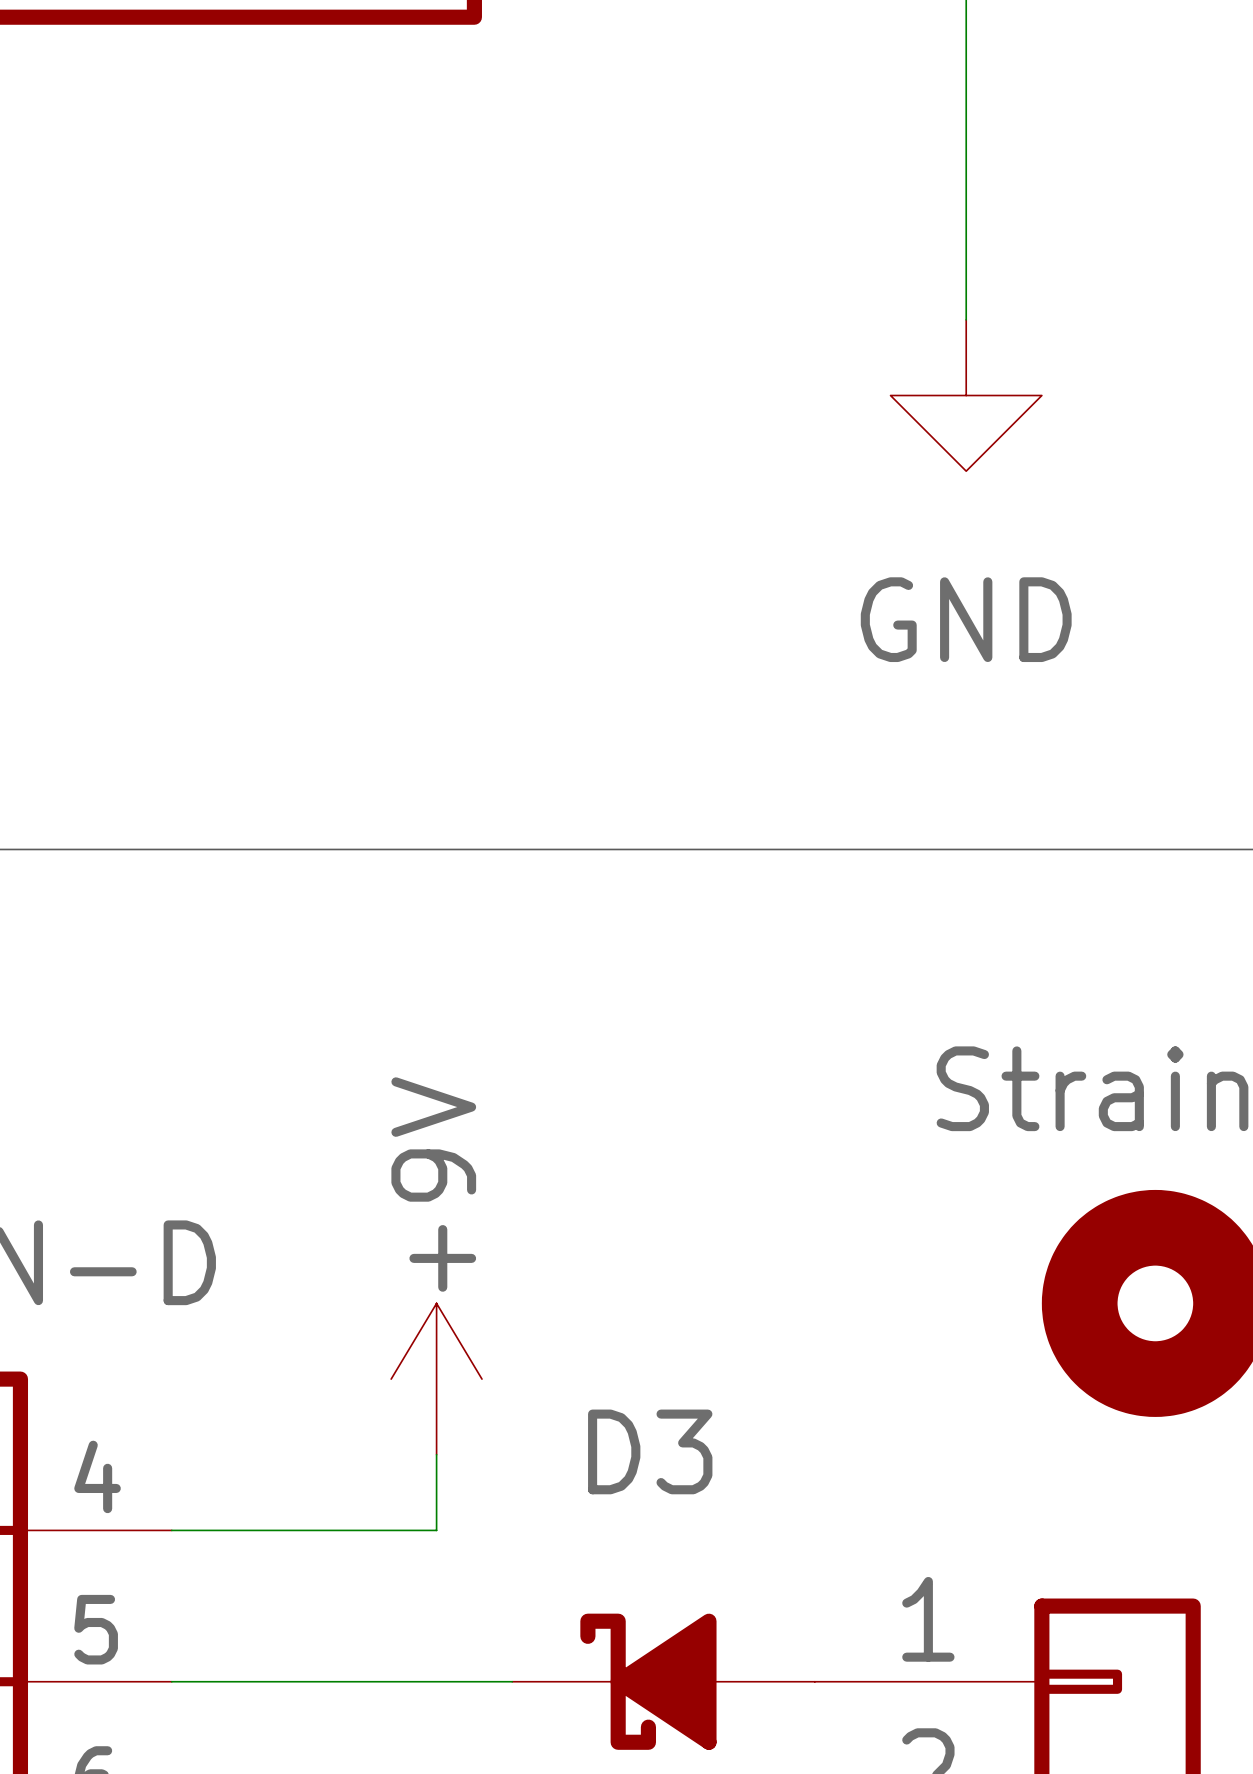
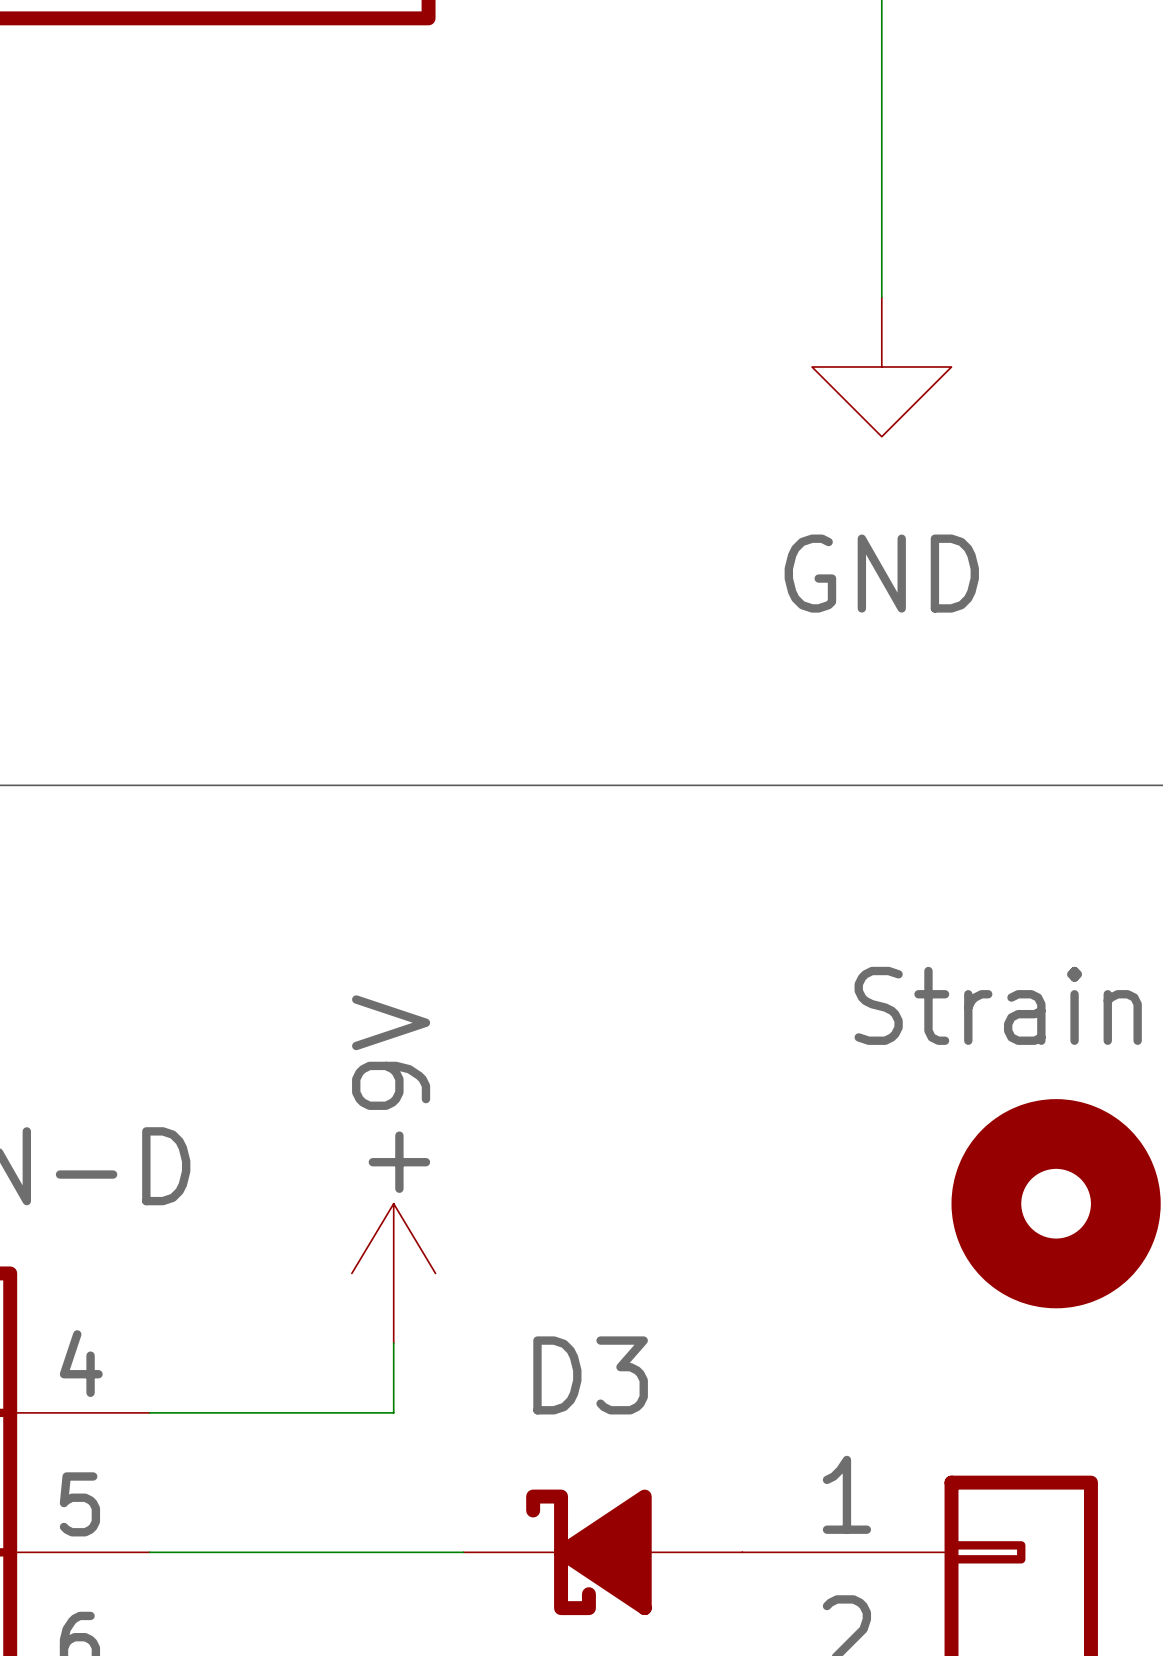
D3 name position: D3 (650, 1451) -> D3 (590, 1375)

